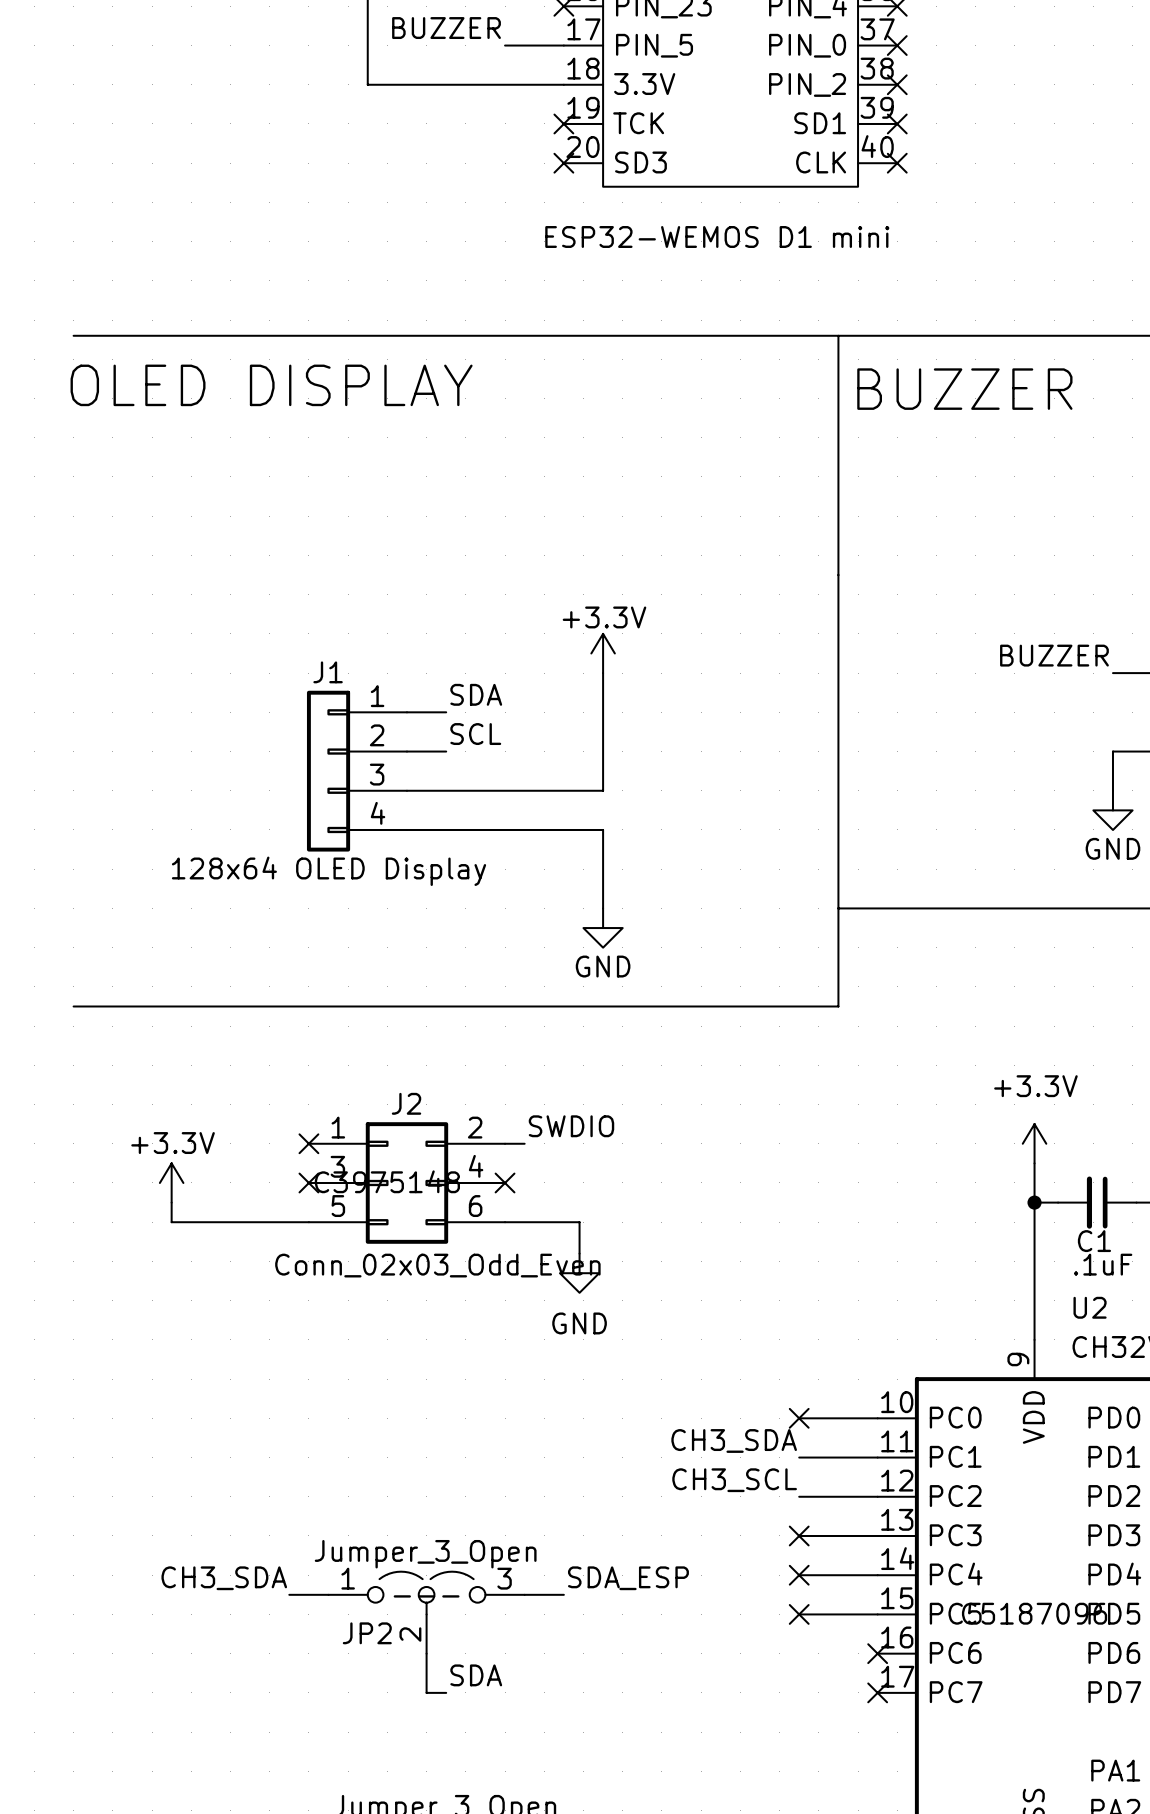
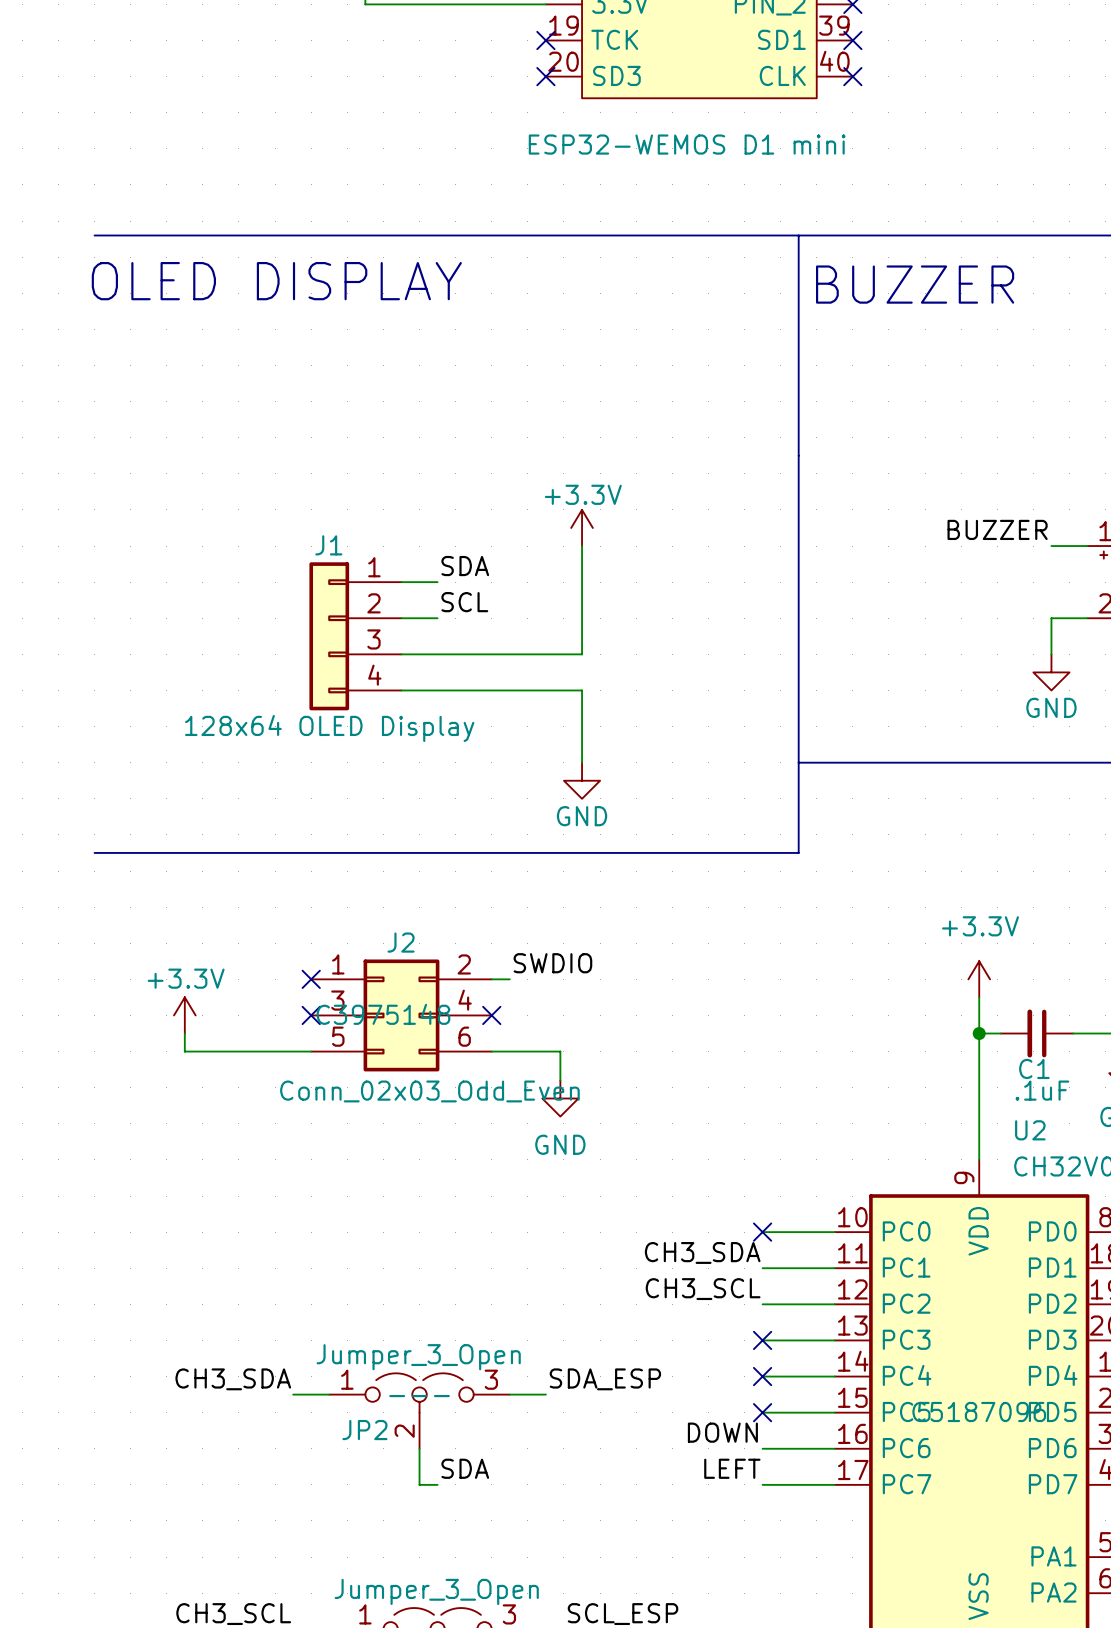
label: none -> DOWN (722, 1432)
wire: none -> (762, 1448) (834, 1448)
no-connect mark: (877, 1653) -> none
label: none -> LEFT (732, 1468)
wire: none -> (762, 1484) (834, 1484)
no-connect mark: (877, 1692) -> none

